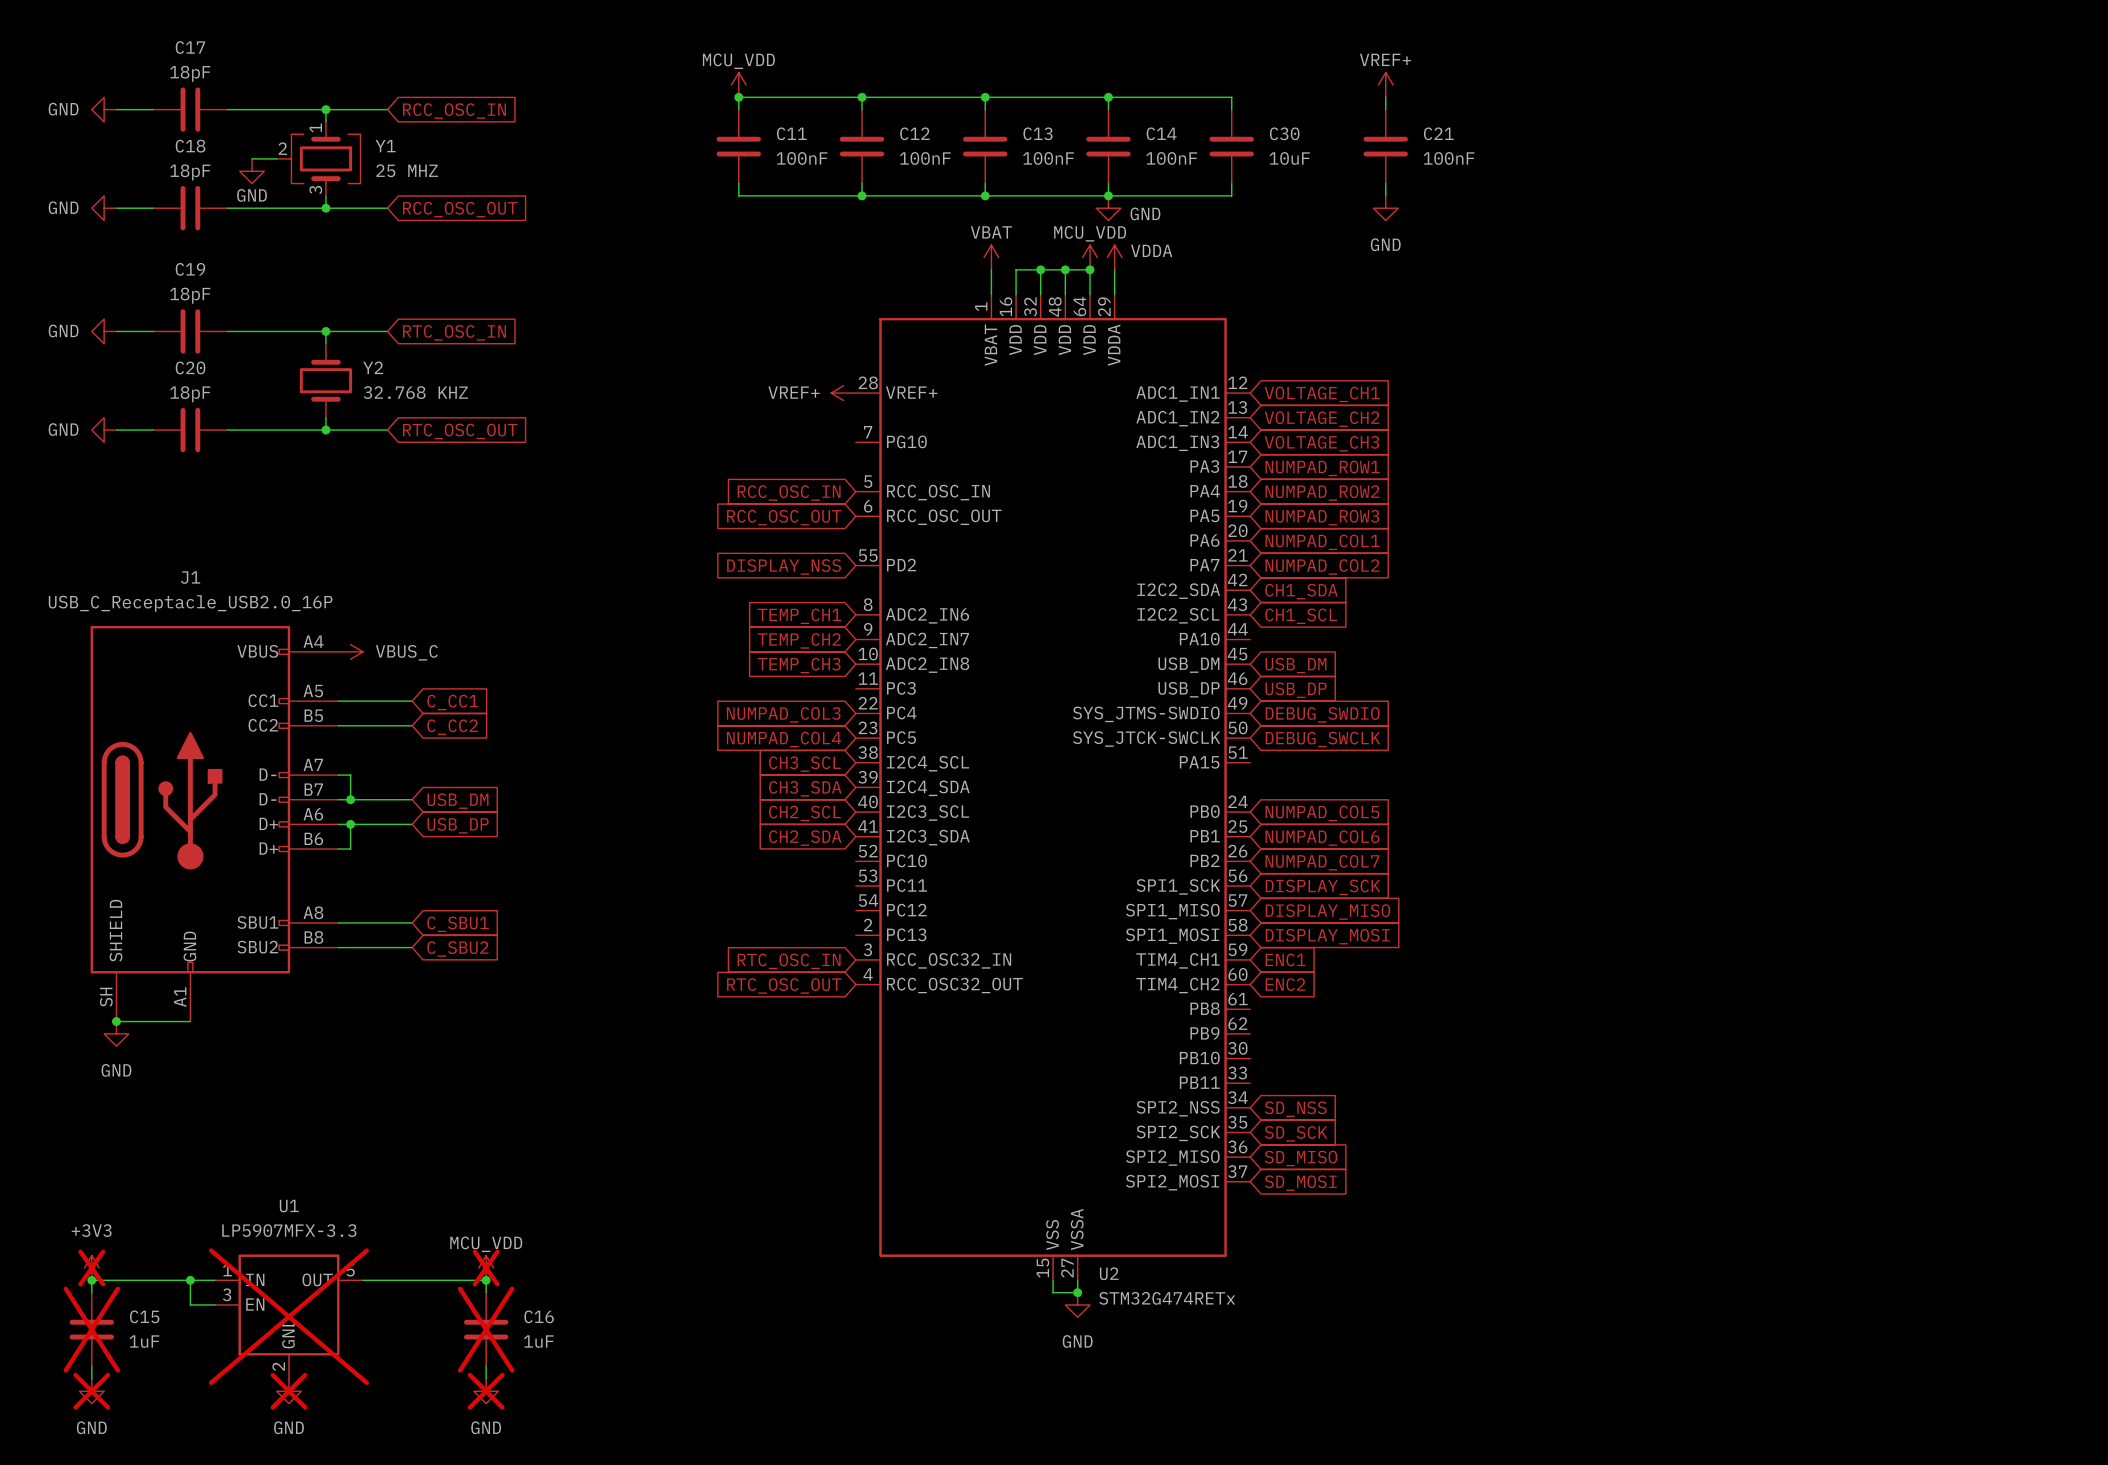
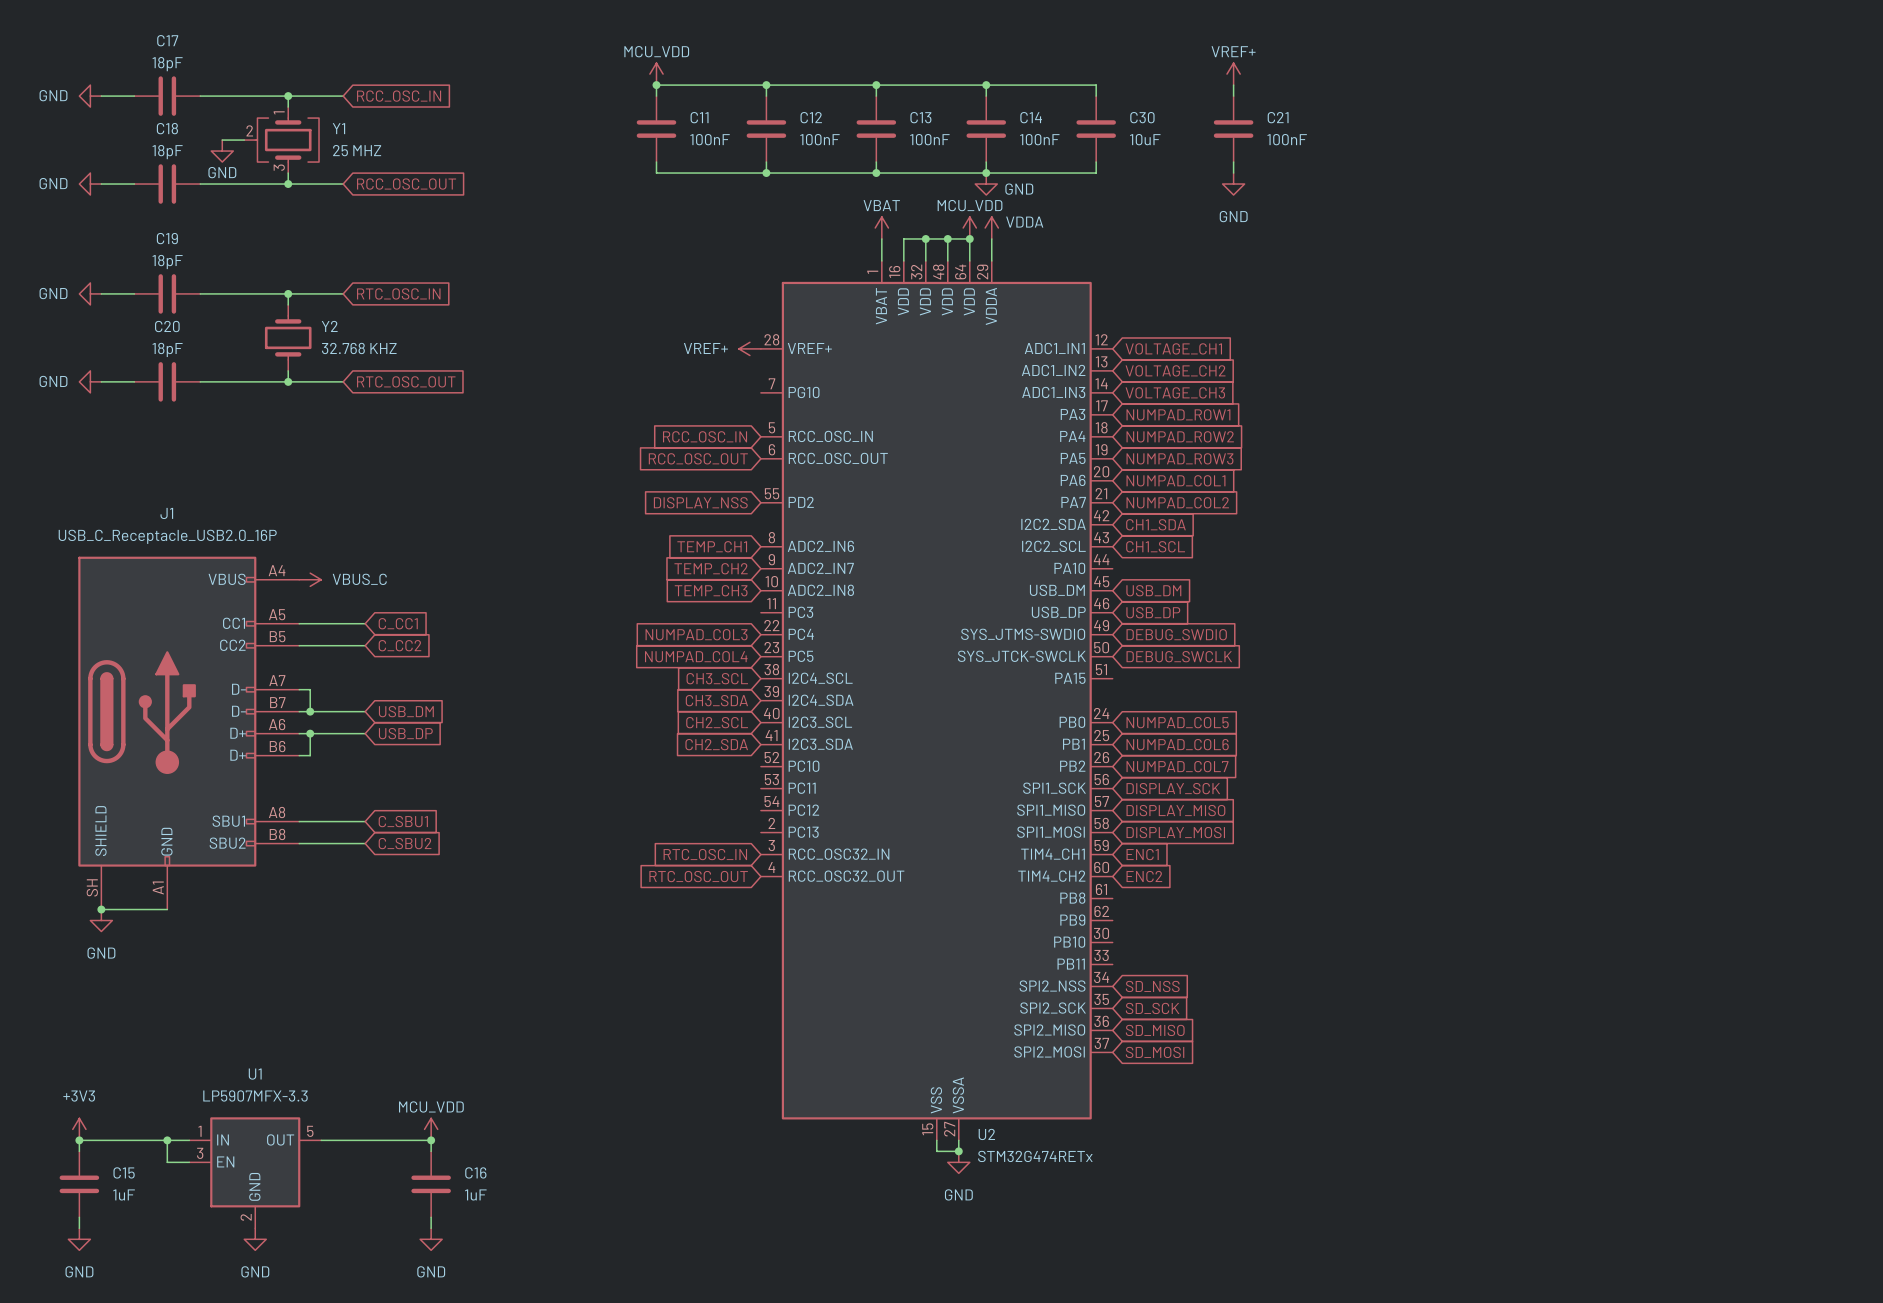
power symbol do-not-place cross: (91, 1268) -> none
power symbol do-not-place cross: (486, 1268) -> none
U1 do-not-place cross: (288, 1316) -> none
C15 do-not-place cross: (91, 1329) -> none
C16 do-not-place cross: (486, 1329) -> none
power symbol do-not-place cross: (91, 1391) -> none
power symbol do-not-place cross: (288, 1391) -> none
power symbol do-not-place cross: (486, 1391) -> none

